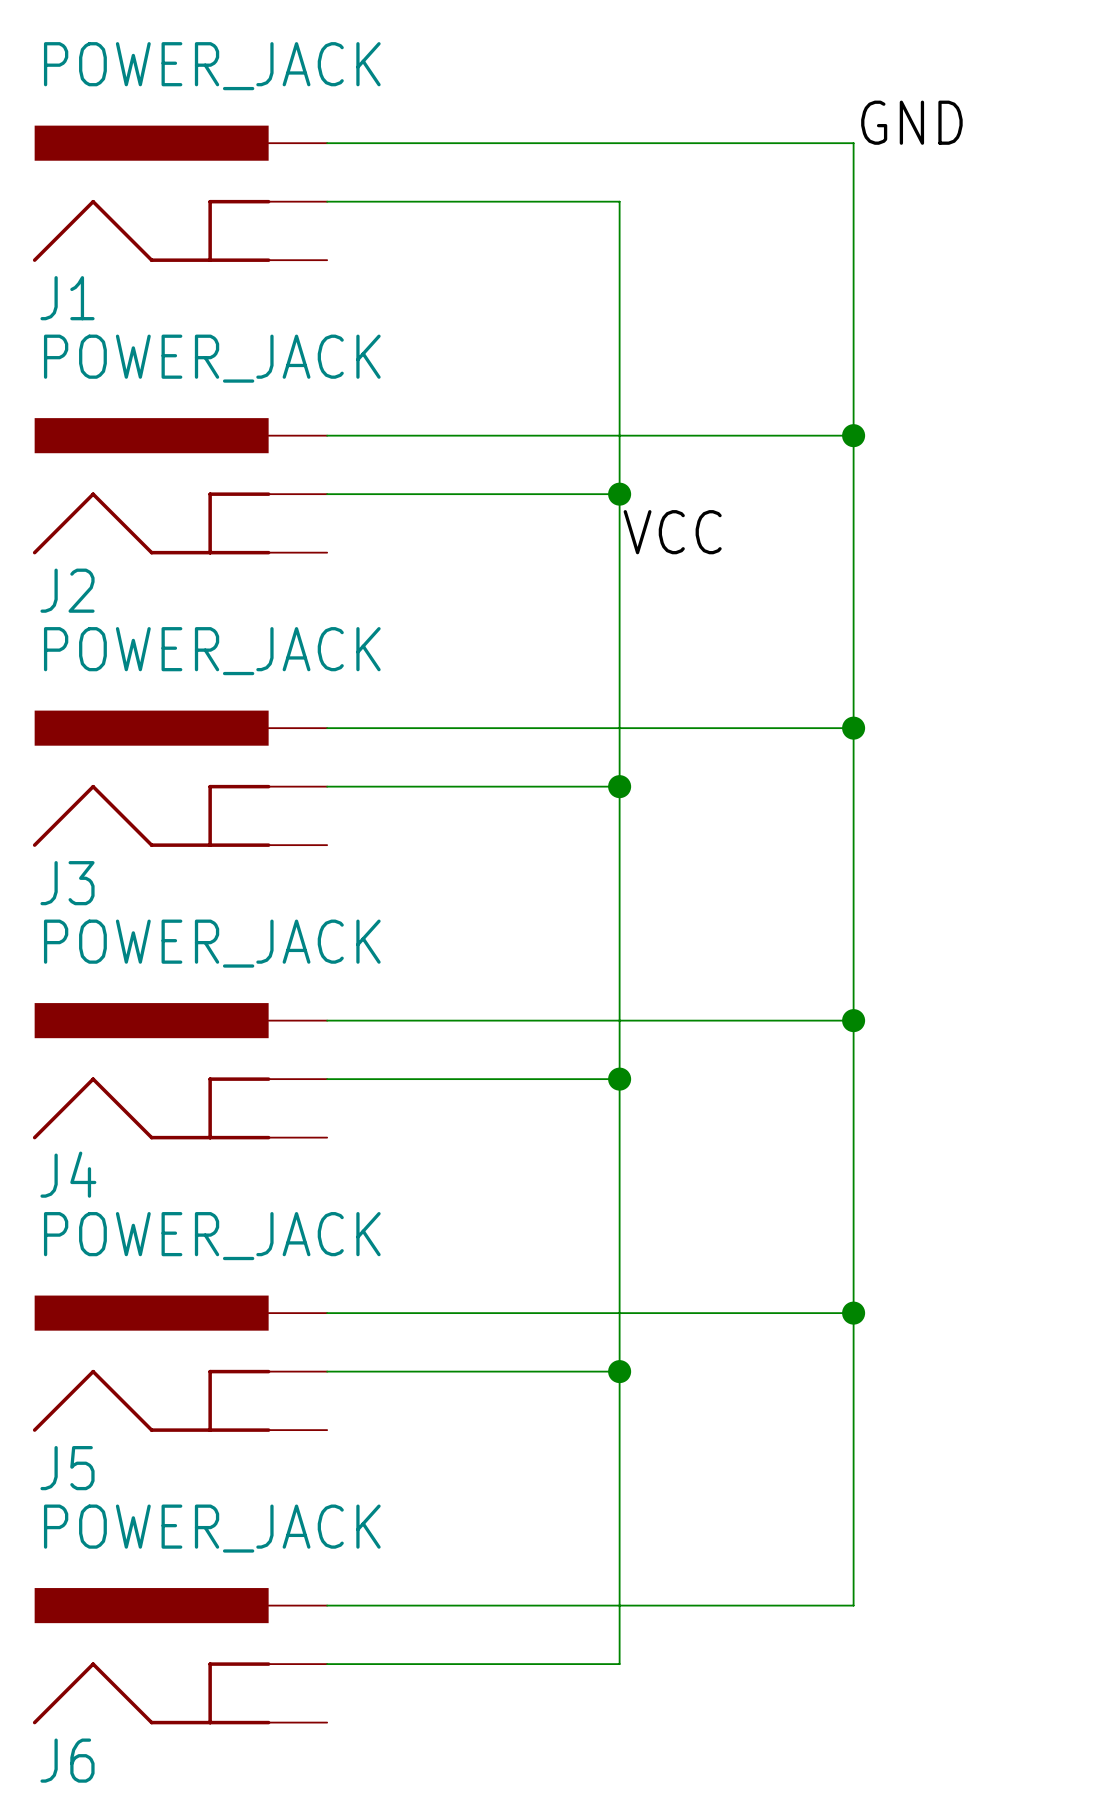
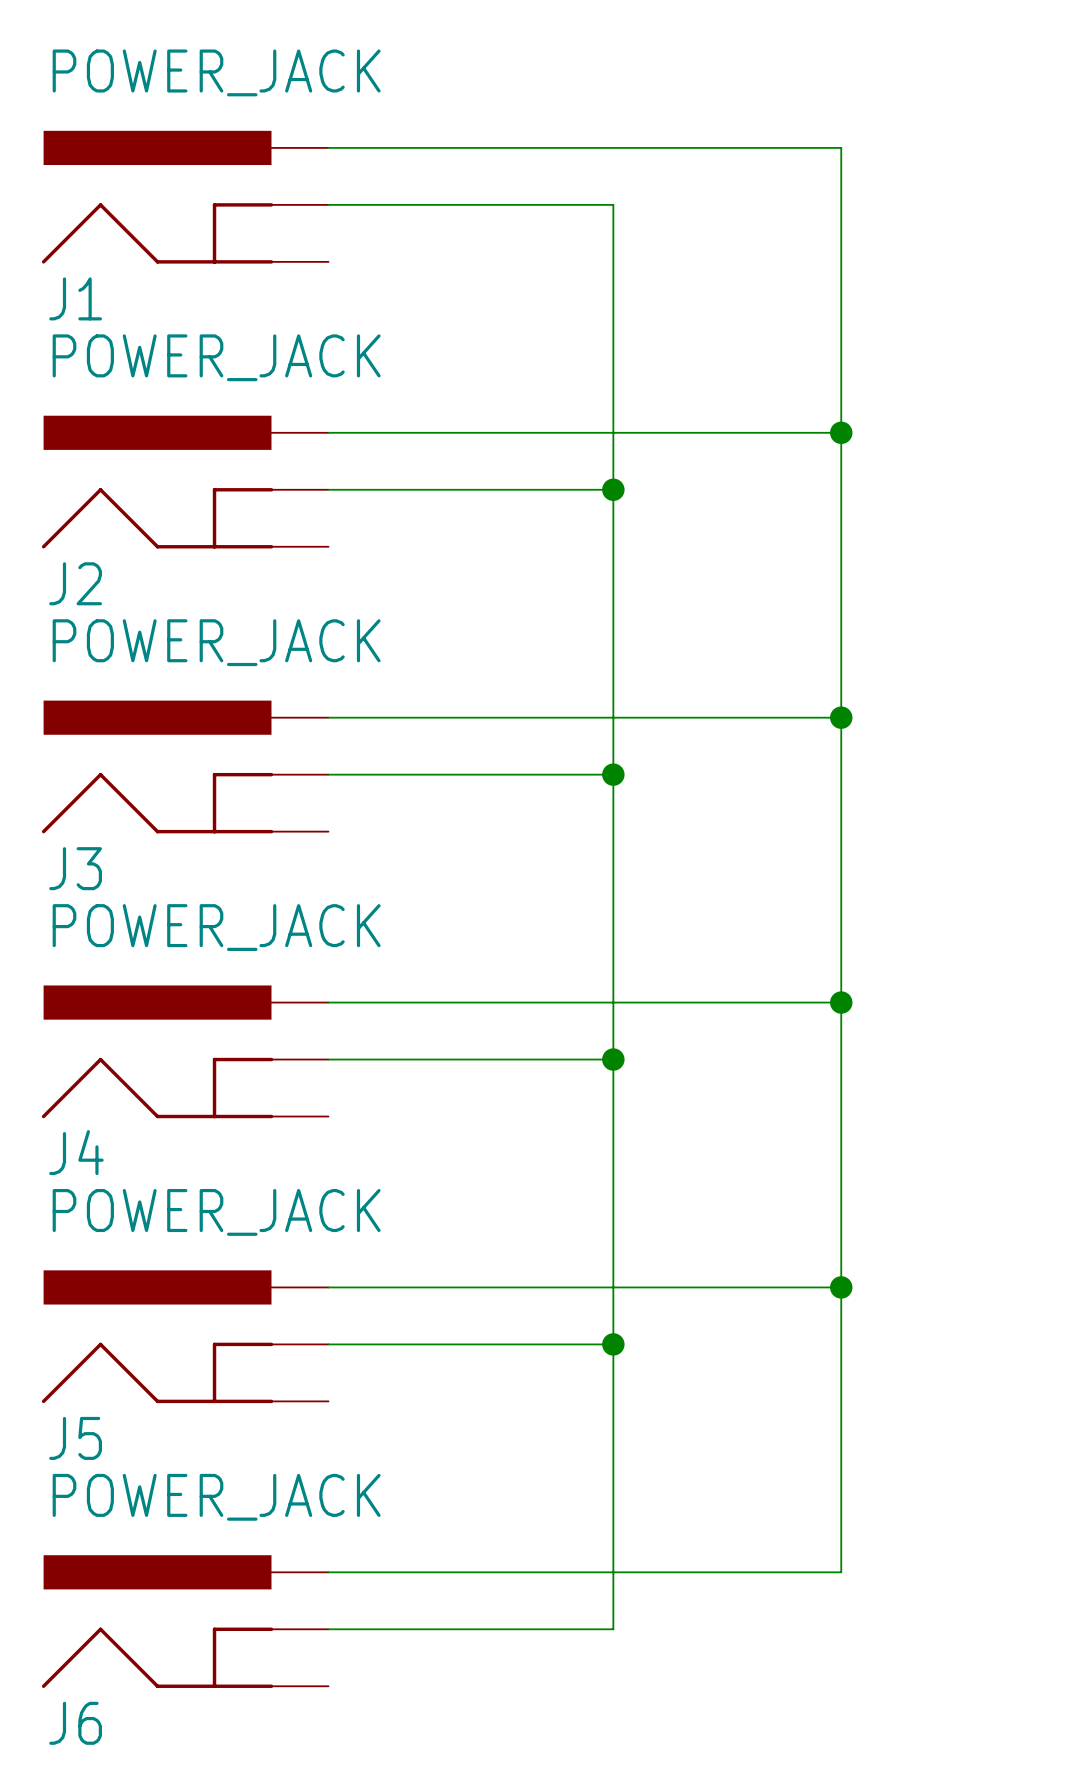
label: GND (911, 122) -> none
label: VCC (672, 532) -> none

